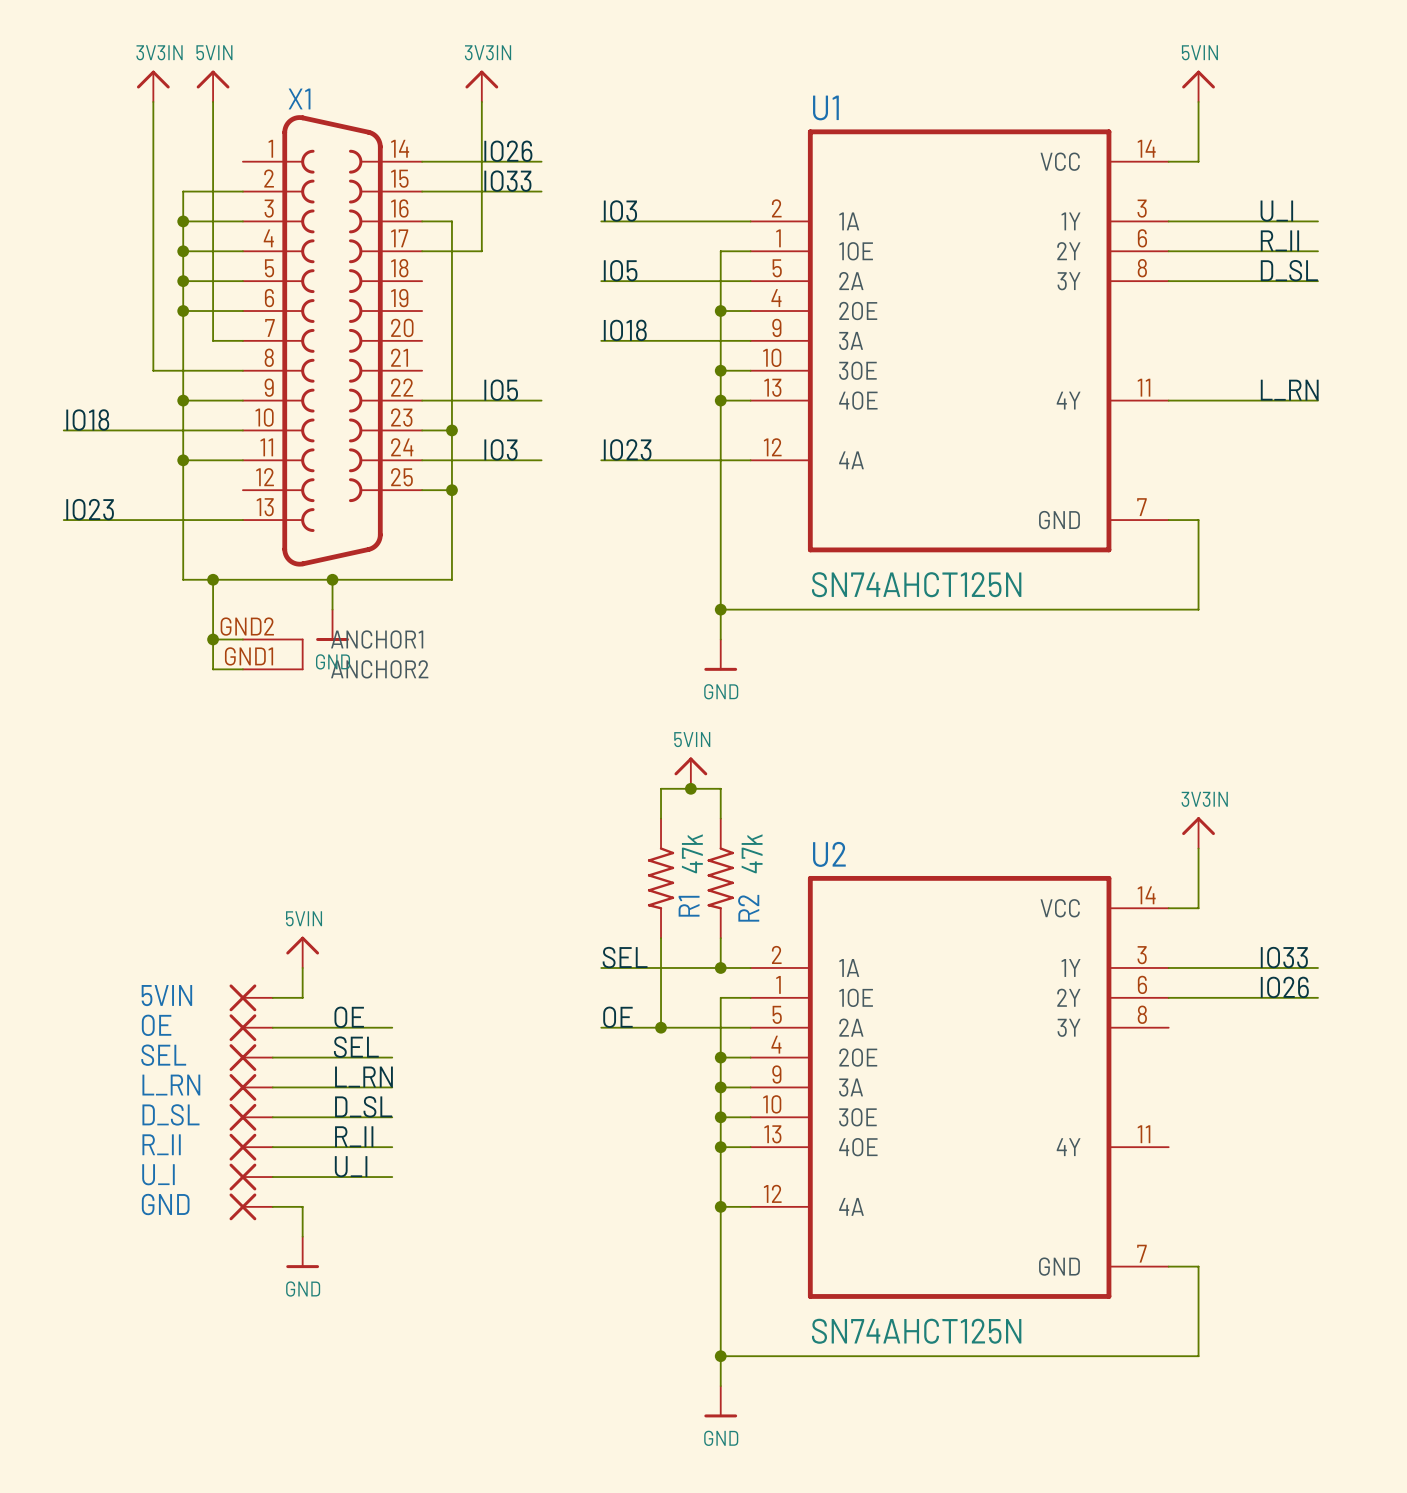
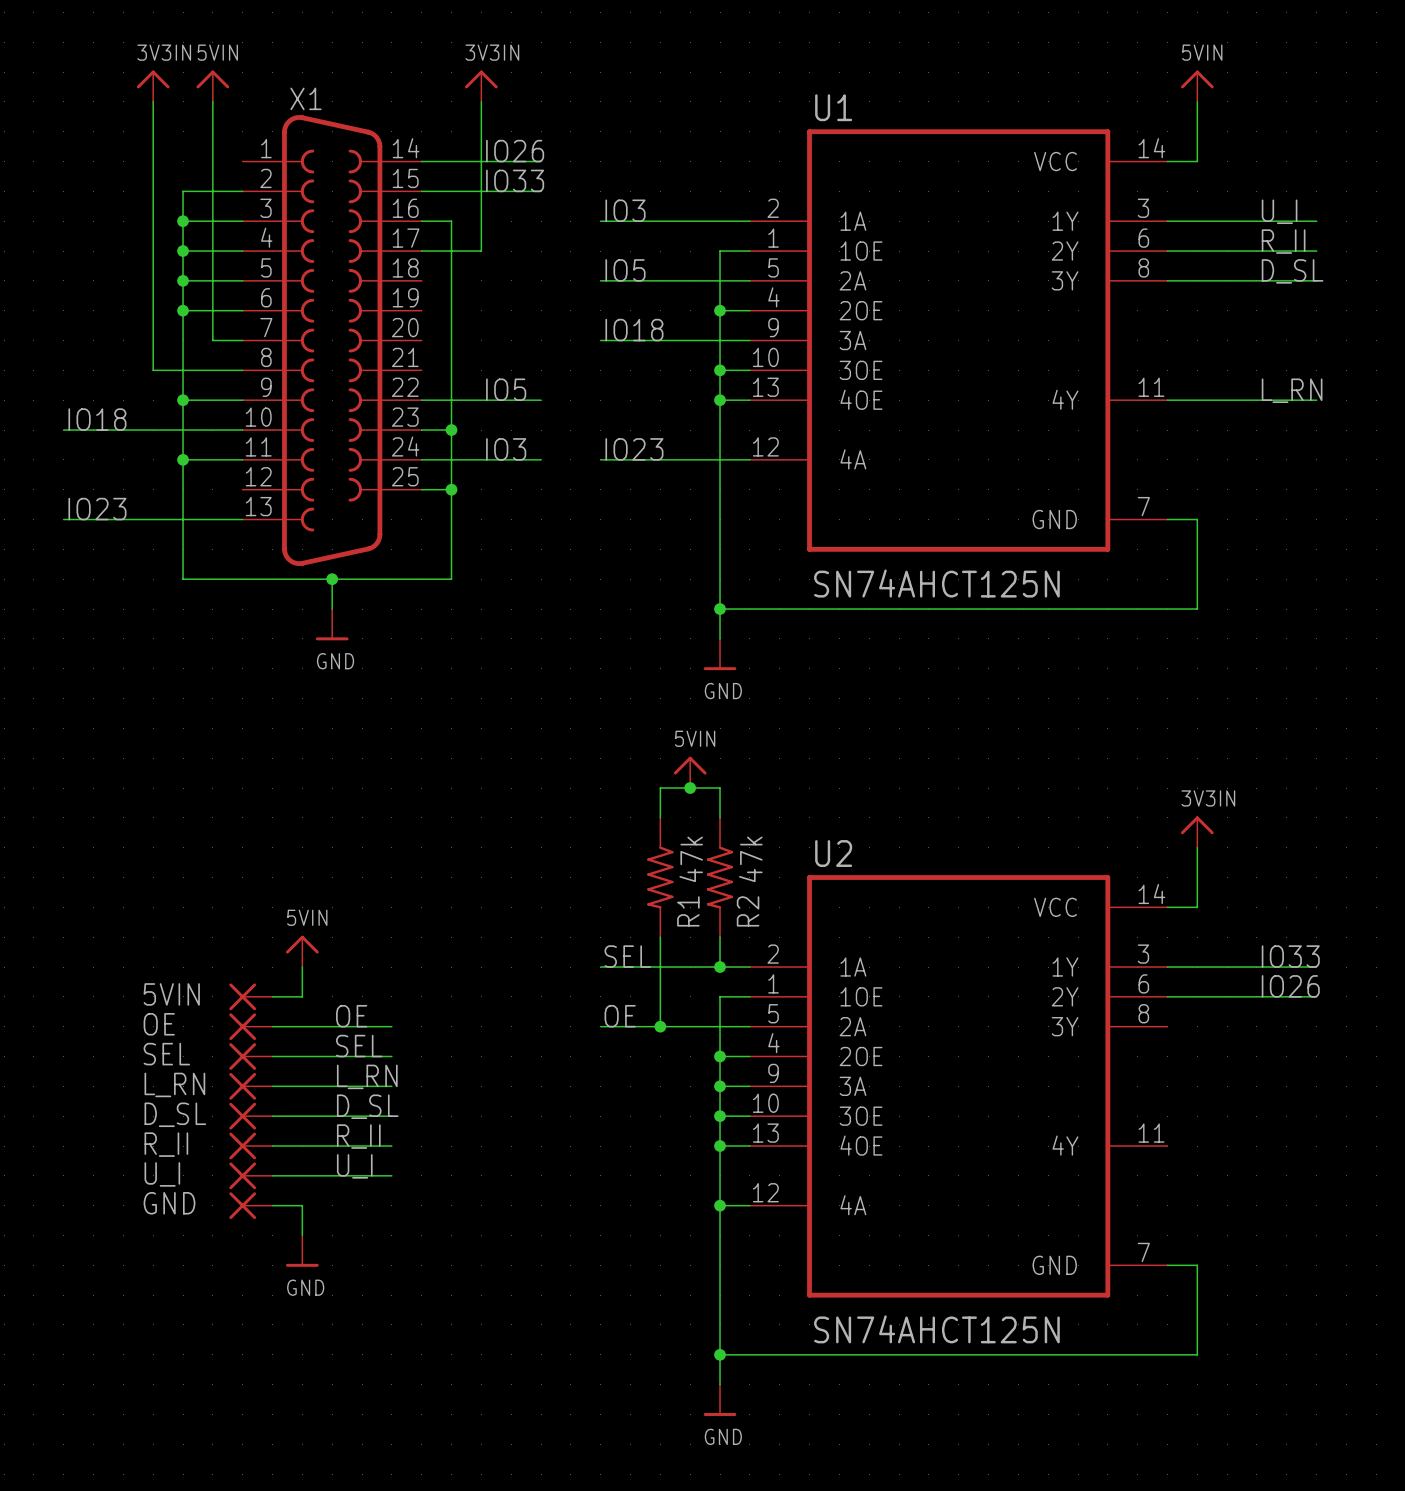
X1 symbol: [242, 115, 423, 671] -> [242, 115, 422, 567]
wire: (213, 579) (213, 669) (242, 669) -> none
junction: (213, 579) -> none
wire: (213, 639) (242, 639) -> none
junction: (213, 639) -> none

